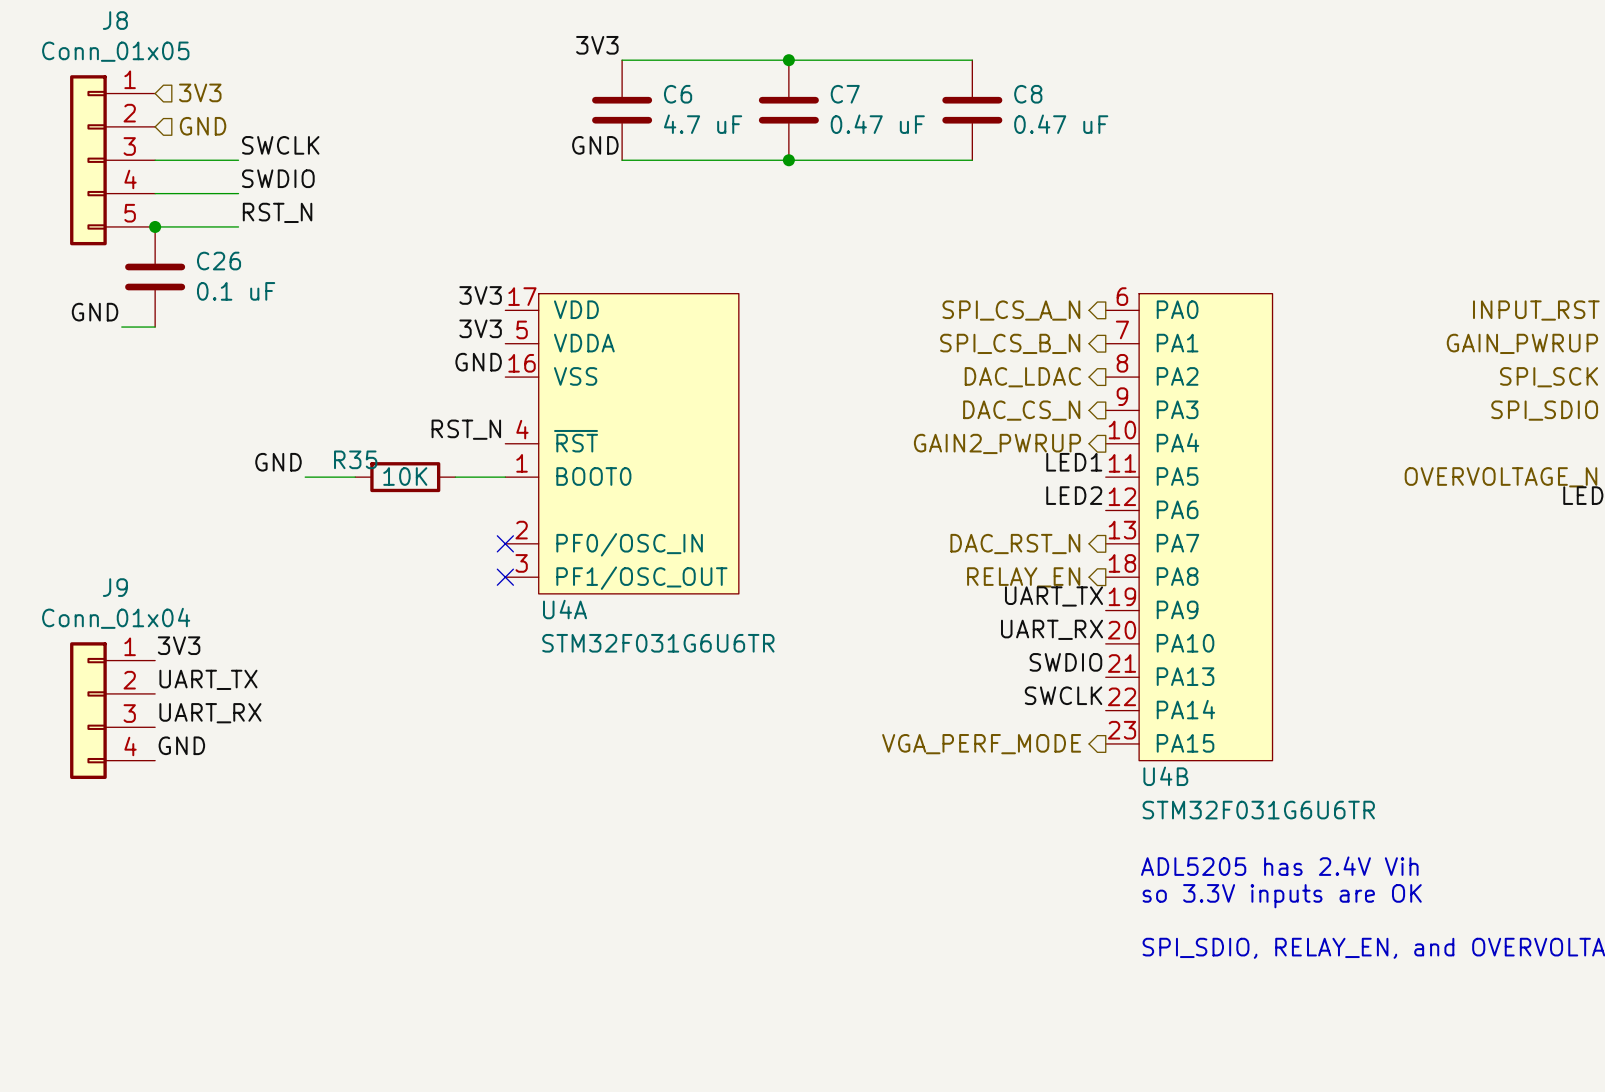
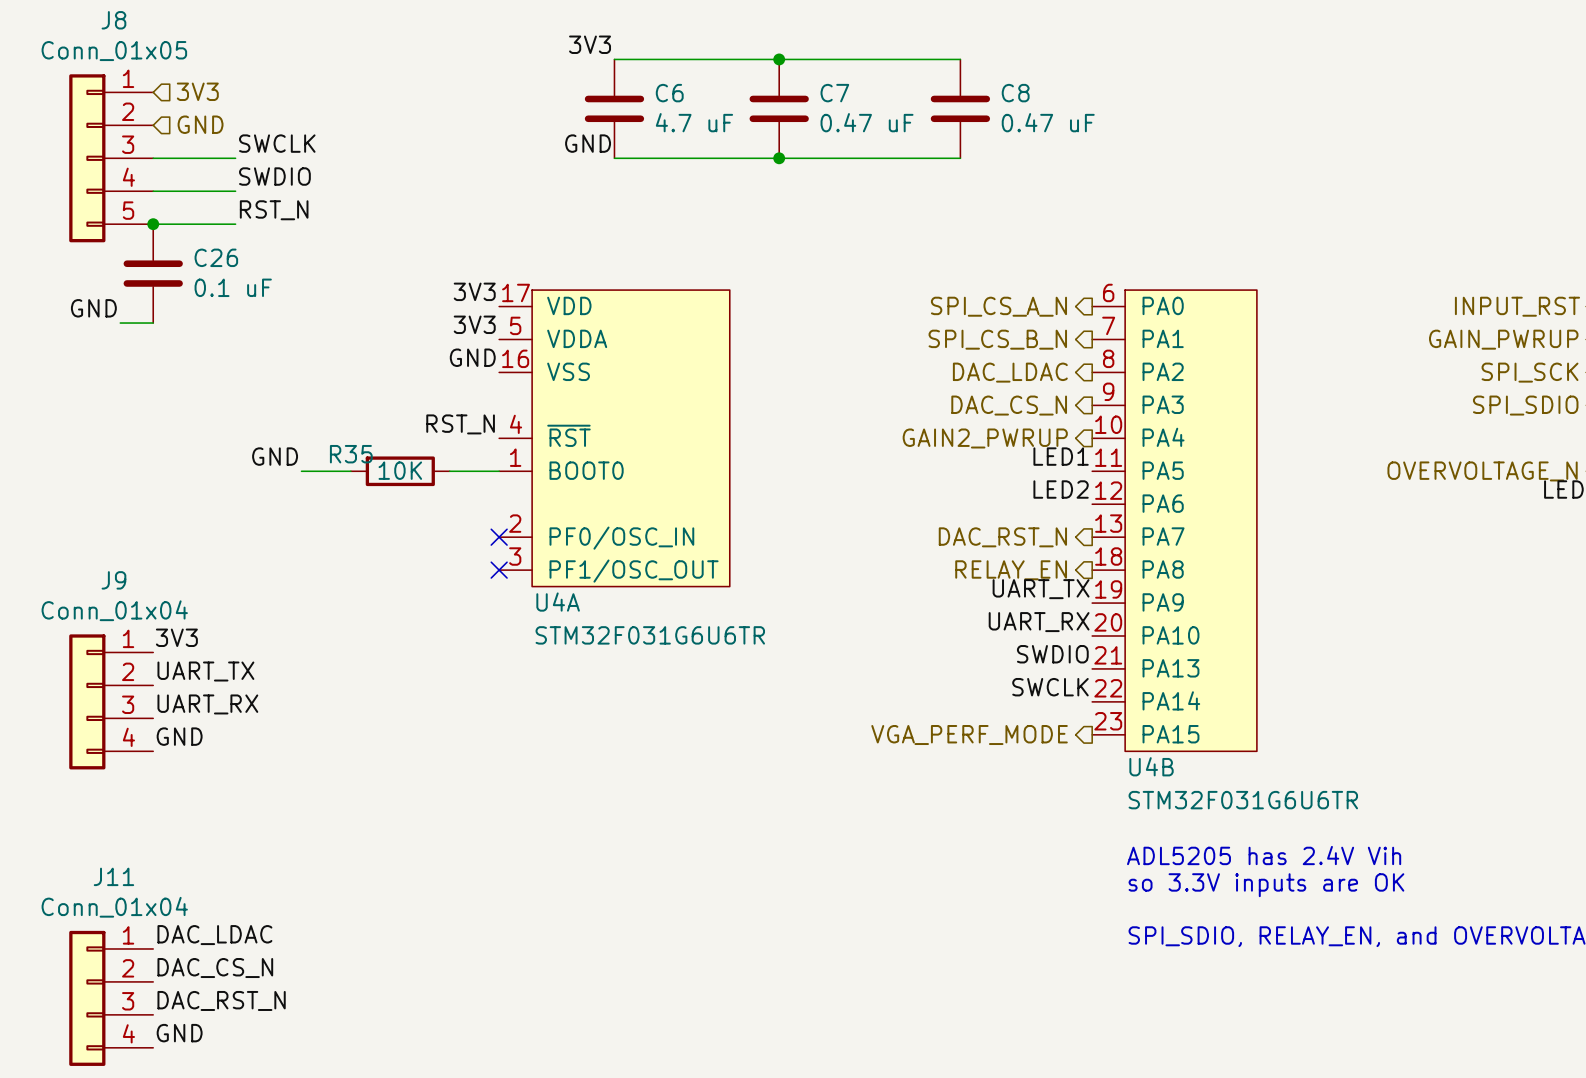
label: none -> DAC_LDAC (214, 935)
label: none -> DAC_CS_N (215, 968)
J11: none -> Conn_01x04 (111, 998)
label: none -> DAC_RST_N (221, 1000)
label: none -> GND (179, 1033)

